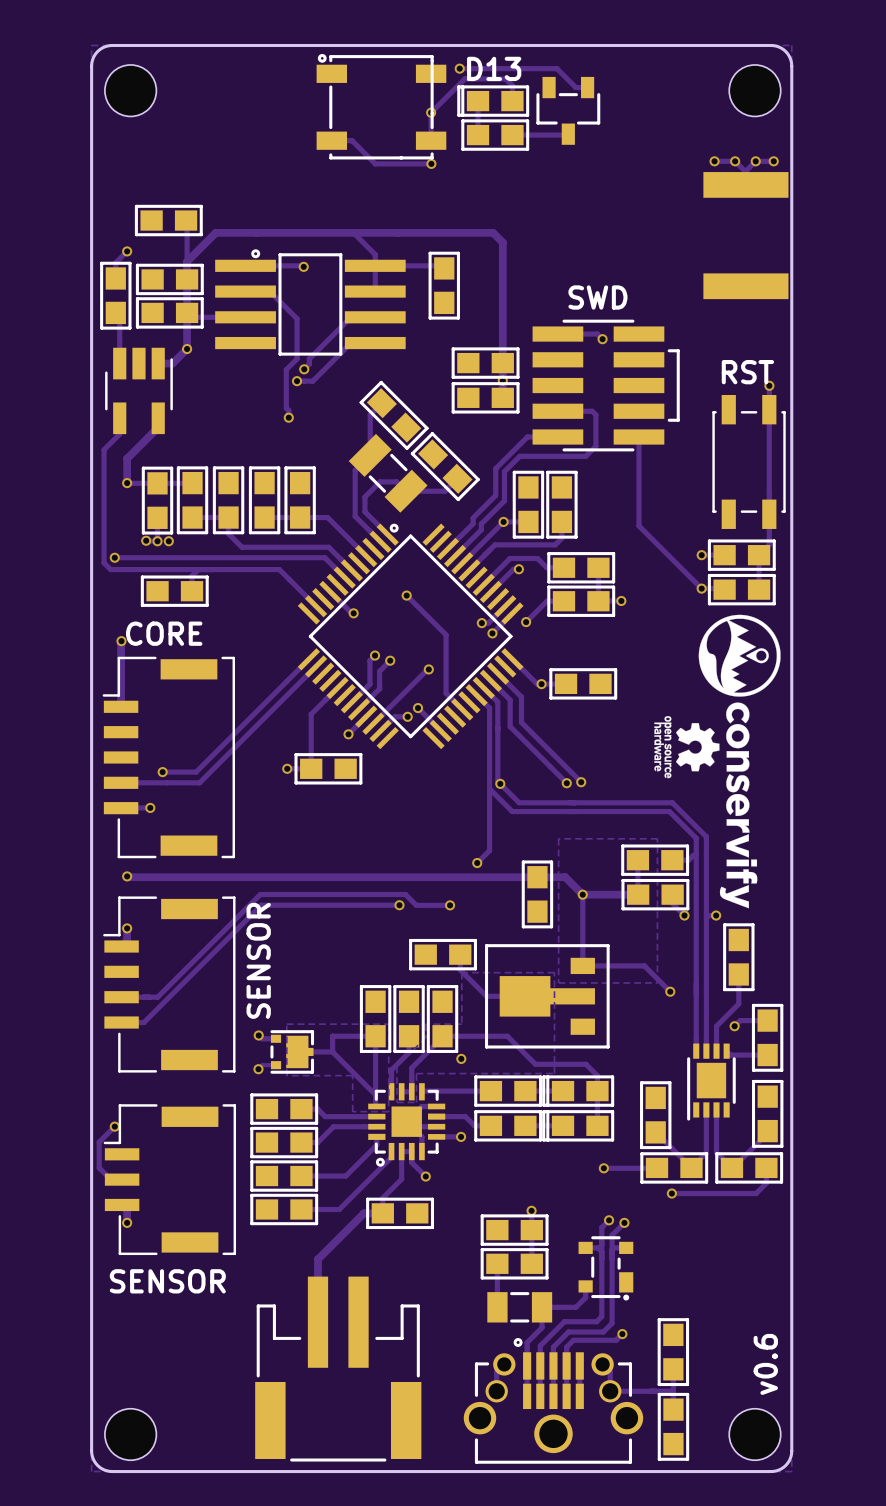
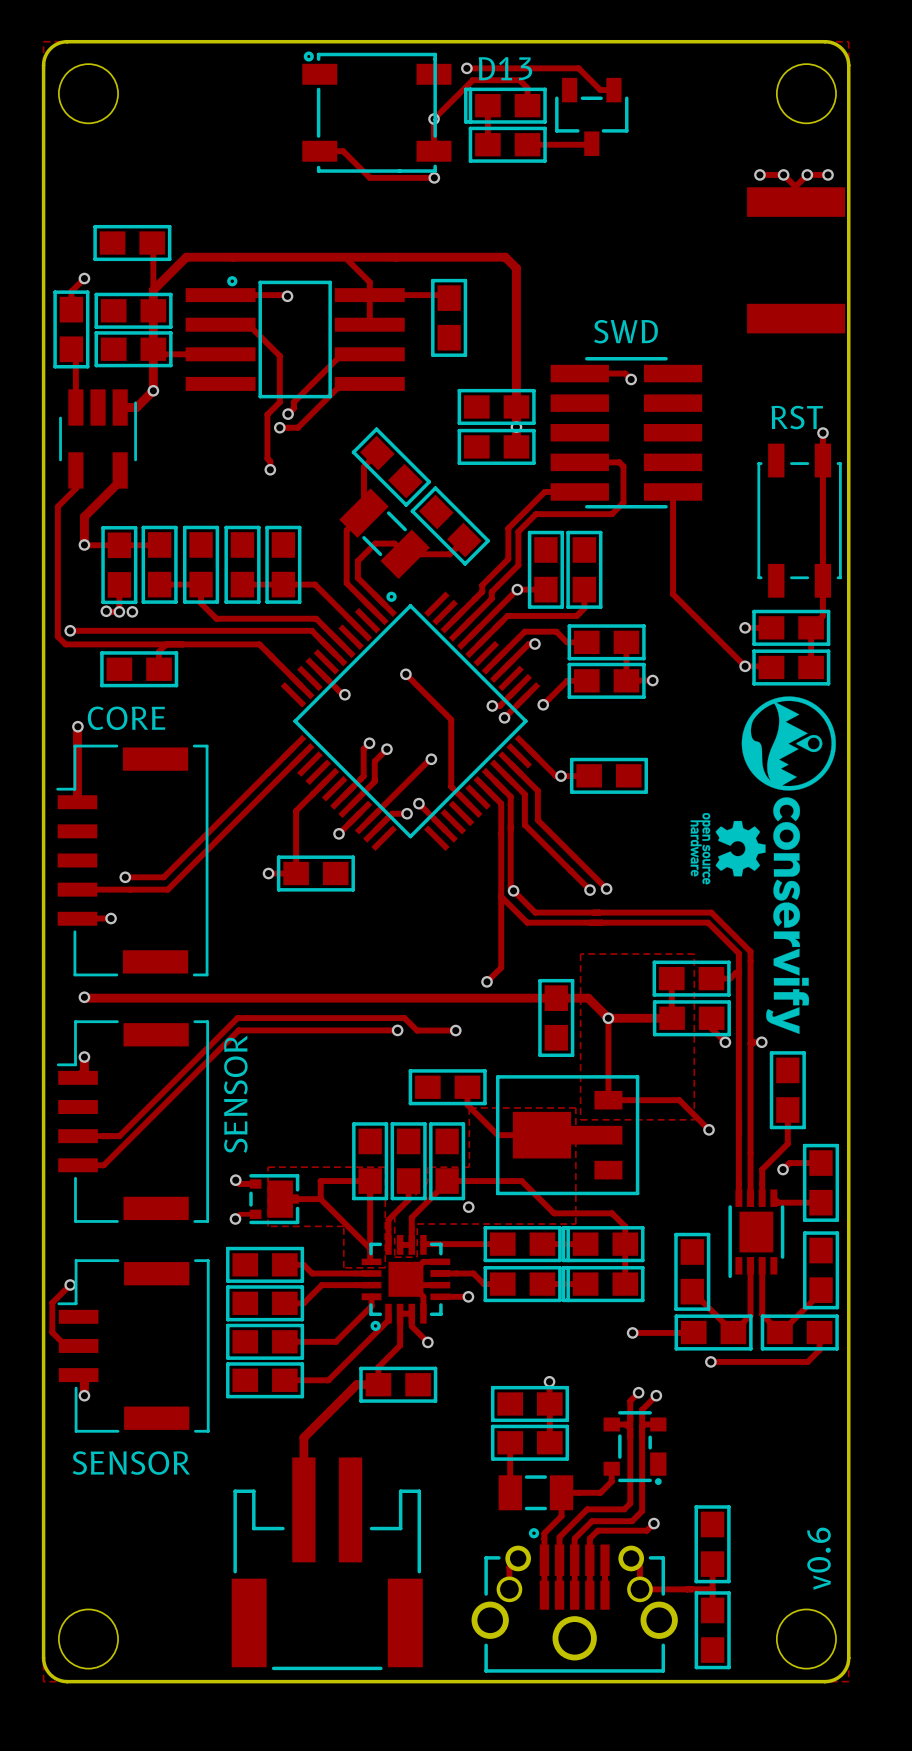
part footprint: [532, 319, 680, 452] -> [550, 357, 703, 509]

